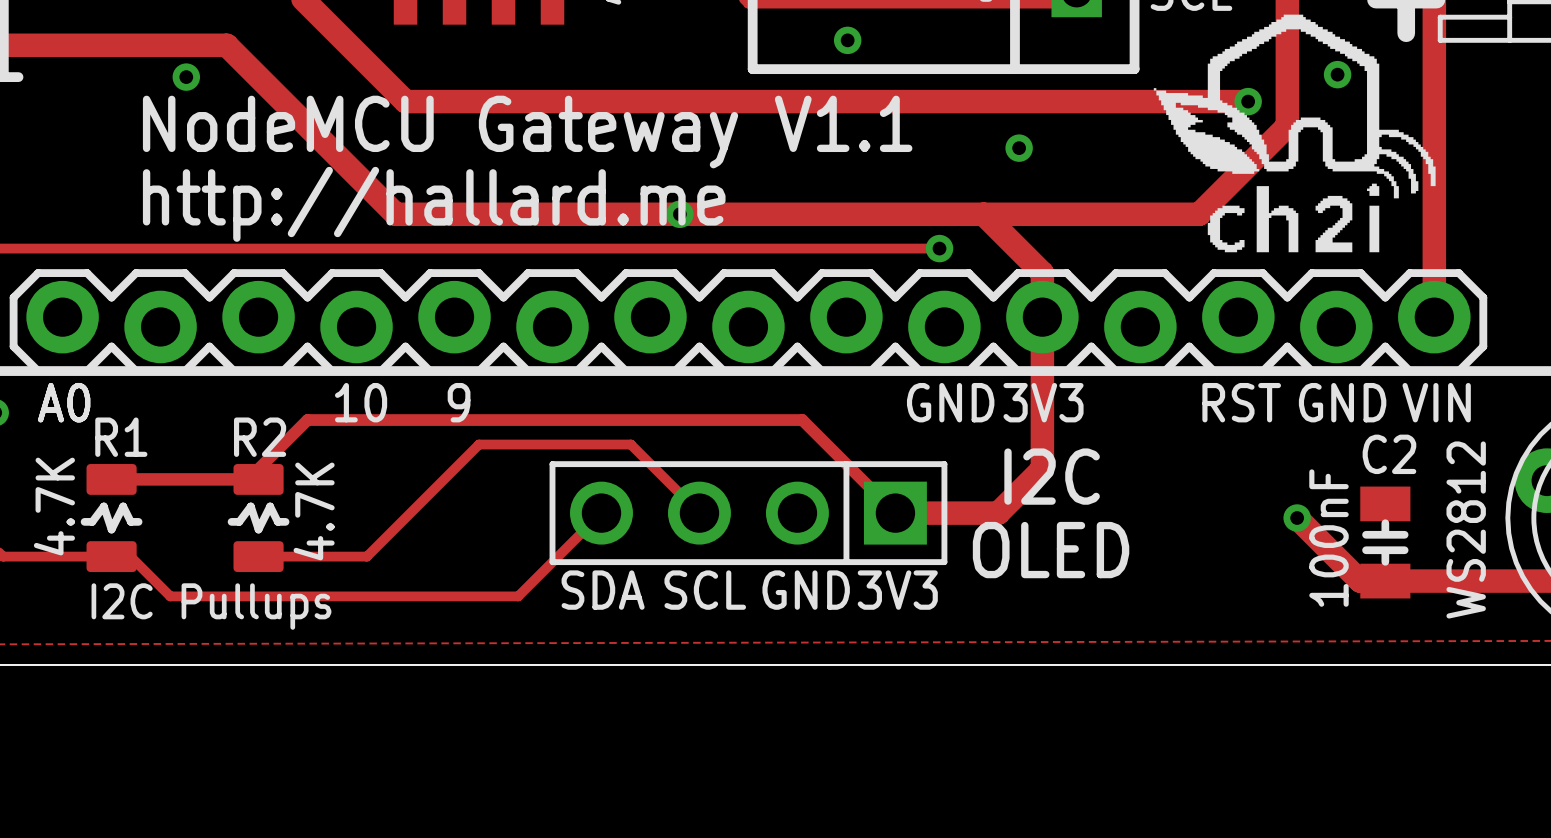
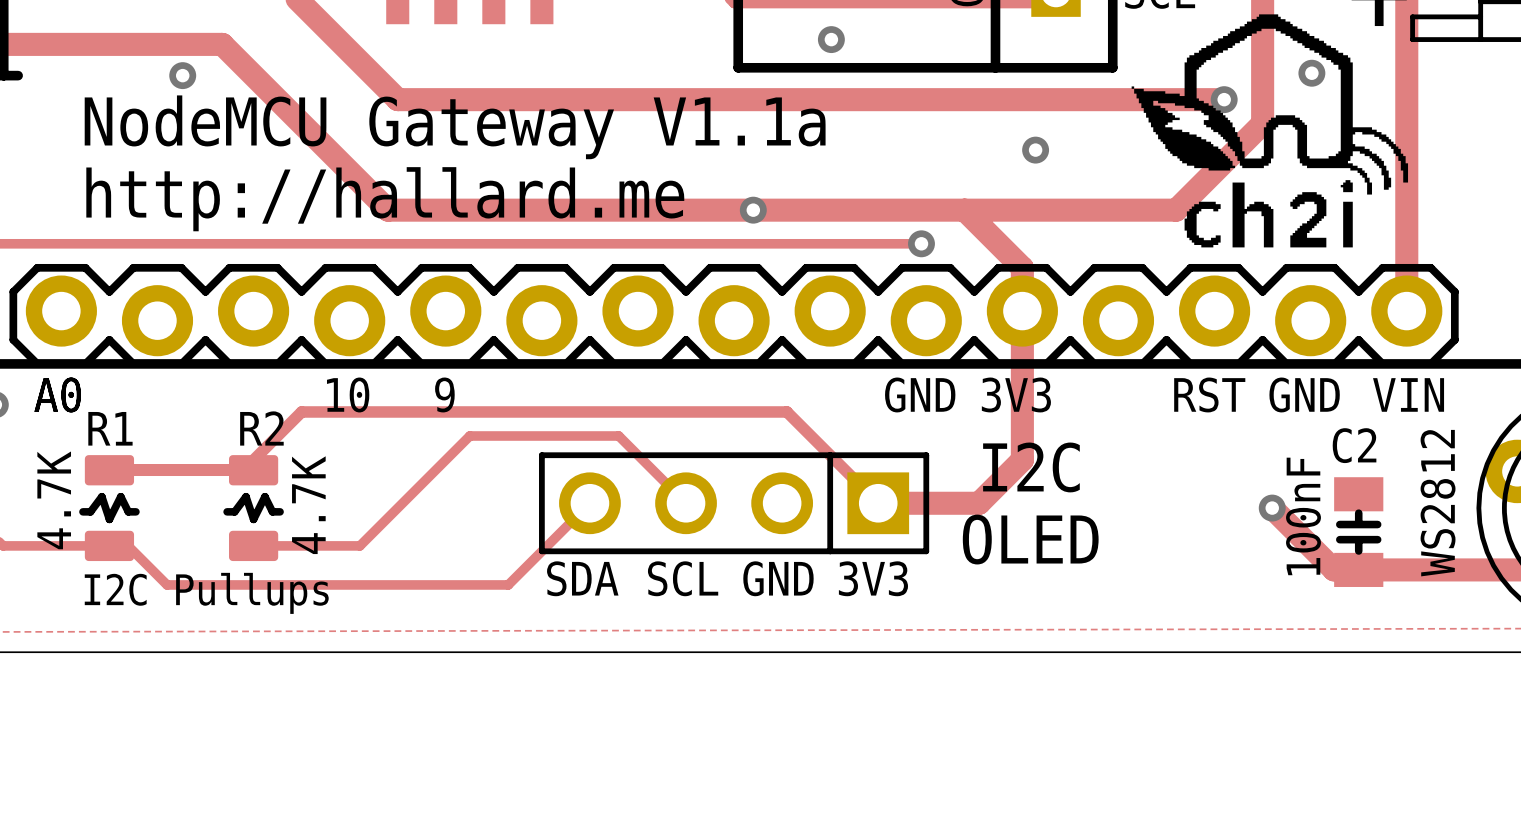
text: NodeMCU Gateway V1.1 (527, 132) -> NodeMCU Gateway V1.1a (455, 127)
via position: (1019, 148) -> (1035, 150)
text position: http://hallard.me (434, 204) -> http://hallard.me (385, 199)
via position: (679, 214) -> (753, 210)

